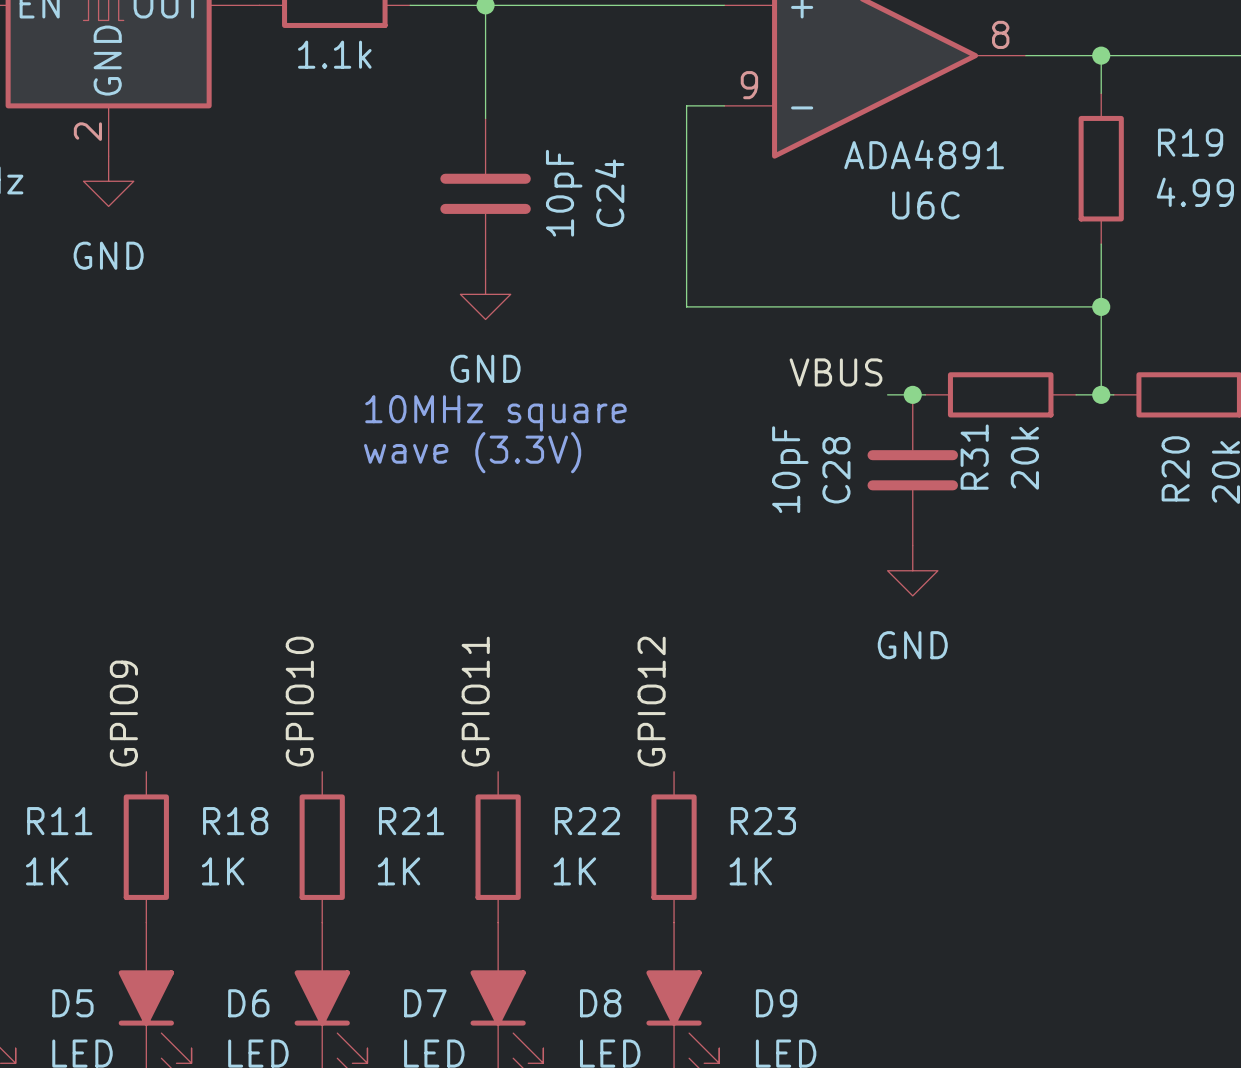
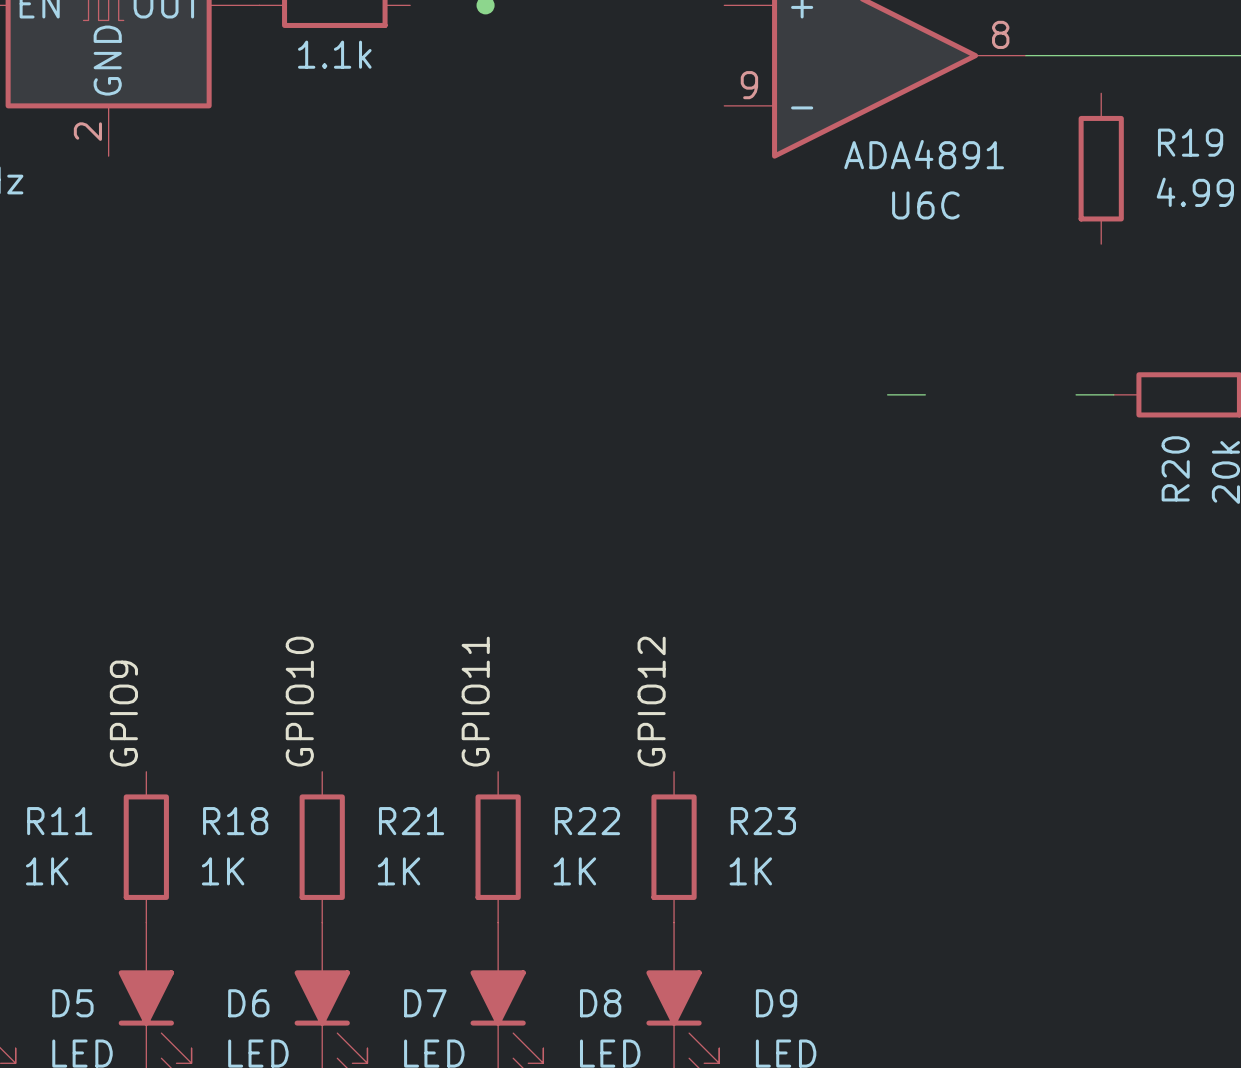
wire: (410, 5) (724, 5) -> none
wire: (485, 5) (485, 118) -> none
wire: (1101, 55) (1101, 93) -> none
junction: (1101, 55) -> none
wire: (724, 105) (686, 105) (686, 306) (1101, 306) -> none
power symbol: GND (108, 181) -> none
C24: 10pF (485, 193) -> none
wire: (1101, 244) (1101, 394) -> none
power symbol: GND (485, 294) -> none
junction: (1101, 306) -> none
label: VBUS (835, 372) -> none
junction: (912, 394) -> none
R31: 20k (1000, 394) -> none
junction: (1101, 394) -> none
text: 10MHz square (495, 413) -> none
text: wave (3.3V) (472, 452) -> none
C28: 10pF (912, 470) -> none
power symbol: GND (912, 570) -> none

